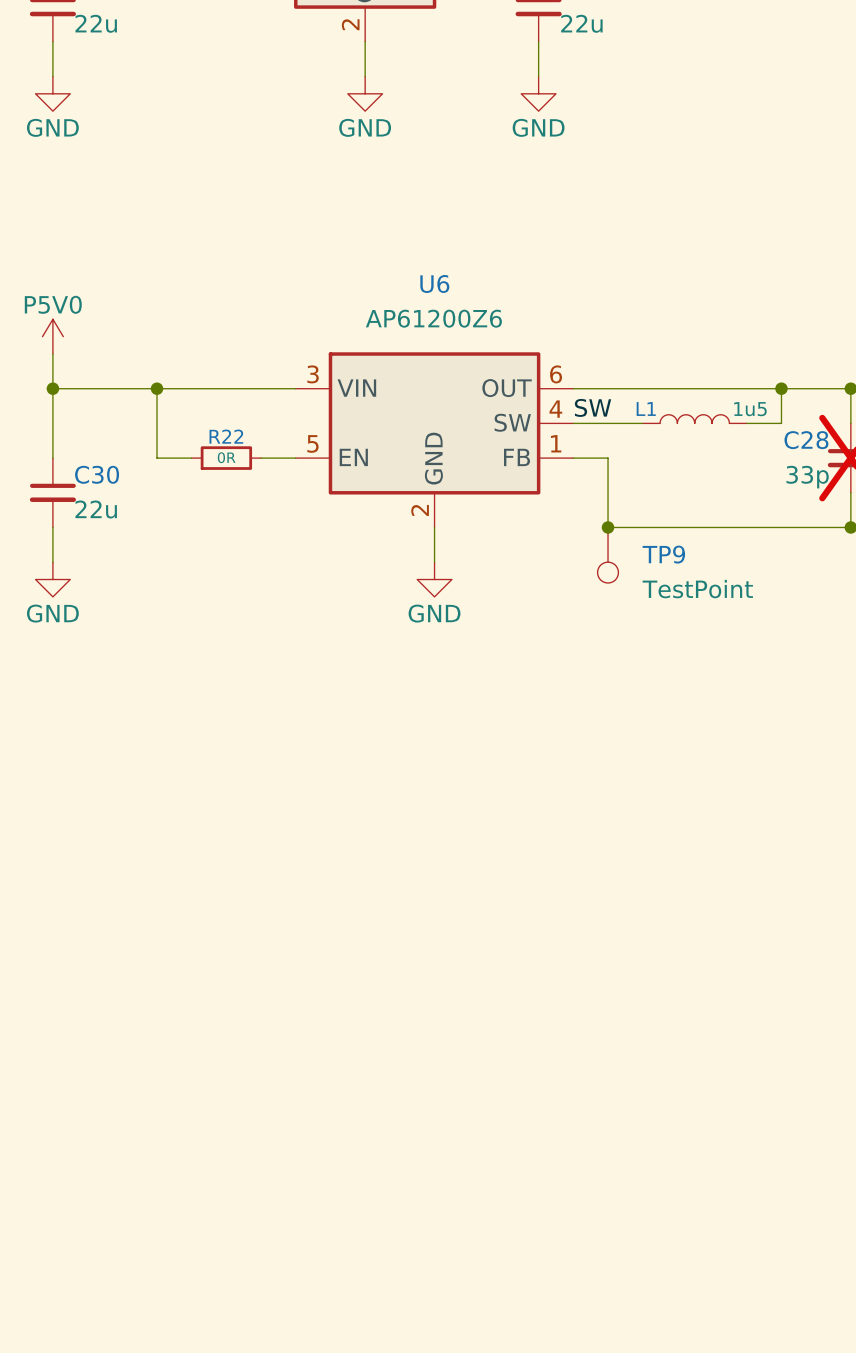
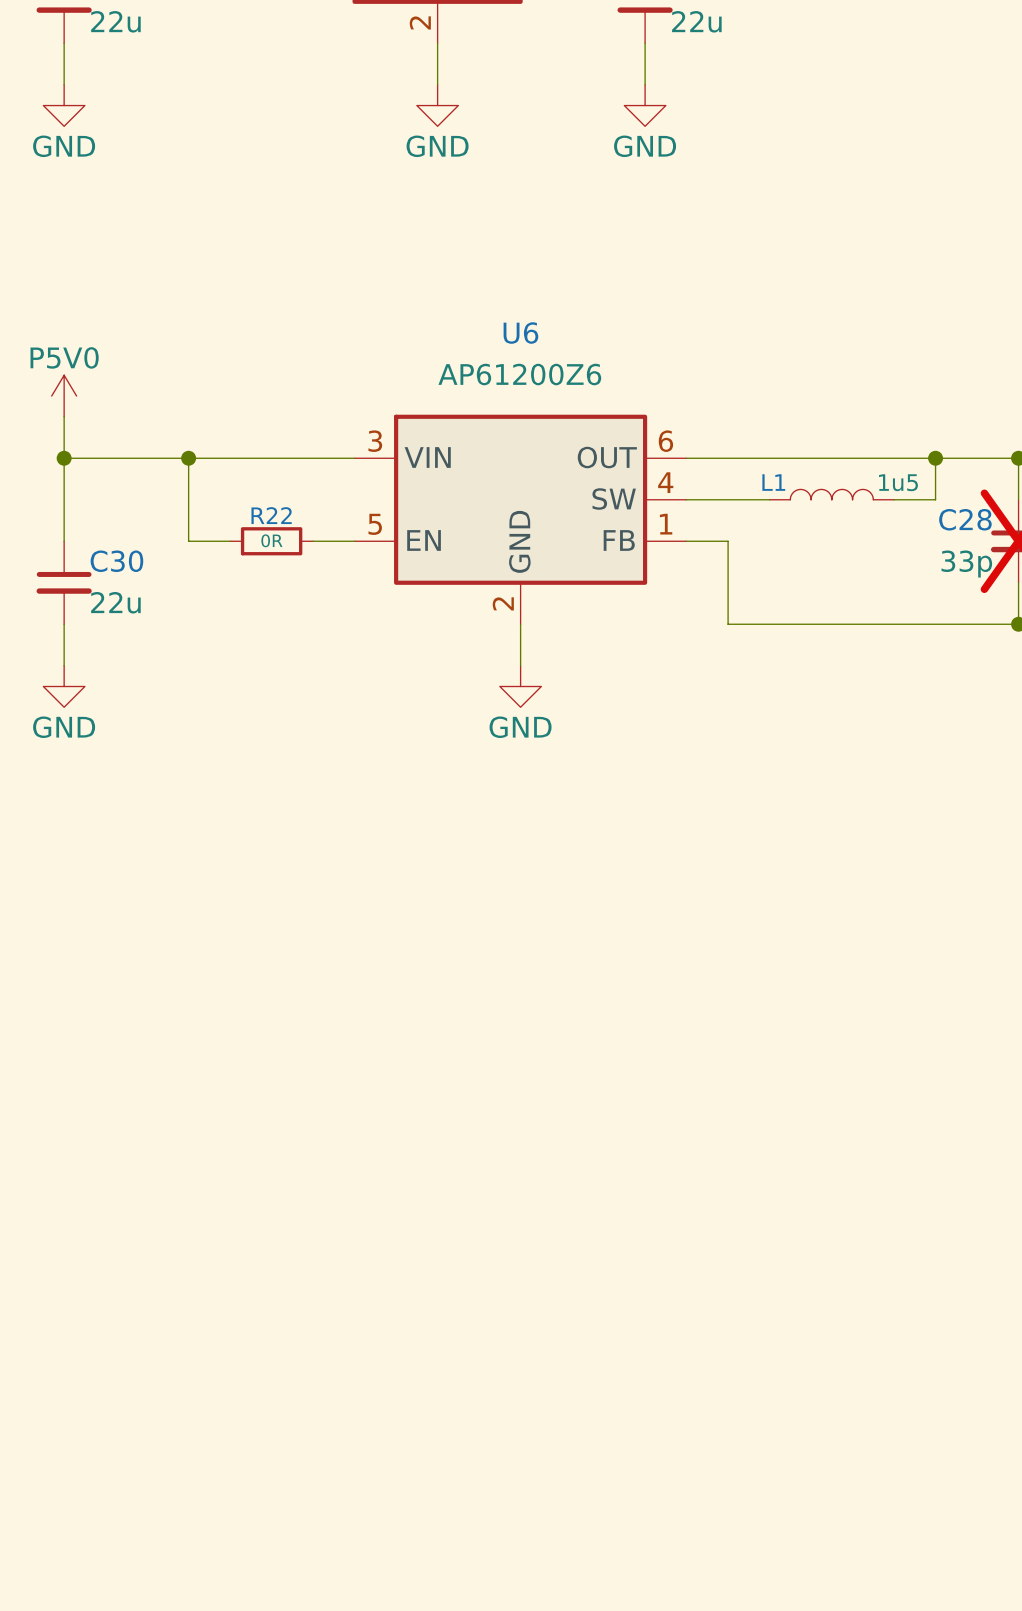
label: SW (593, 407) -> none
junction: (608, 527) -> none
TP9: TestPoint (608, 555) -> none

